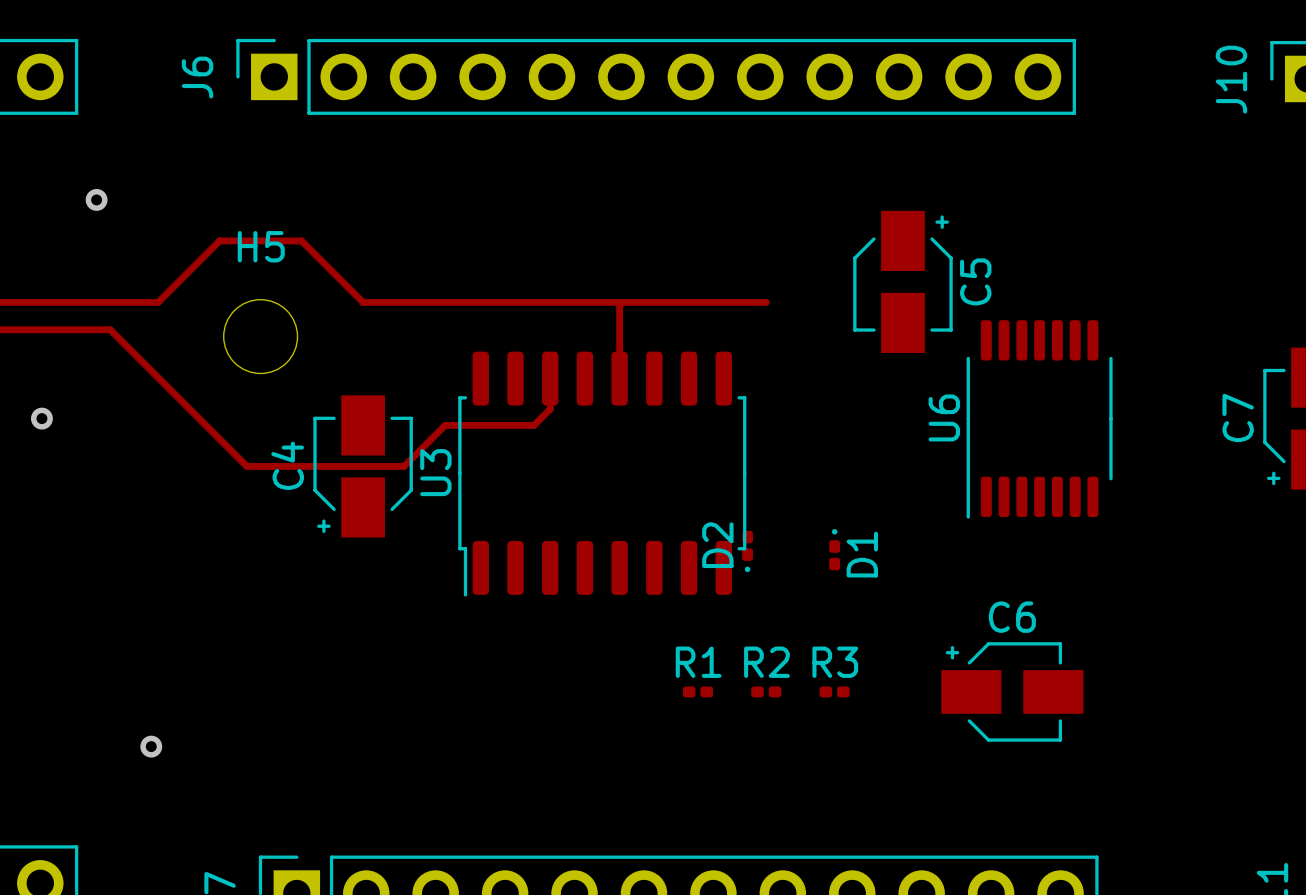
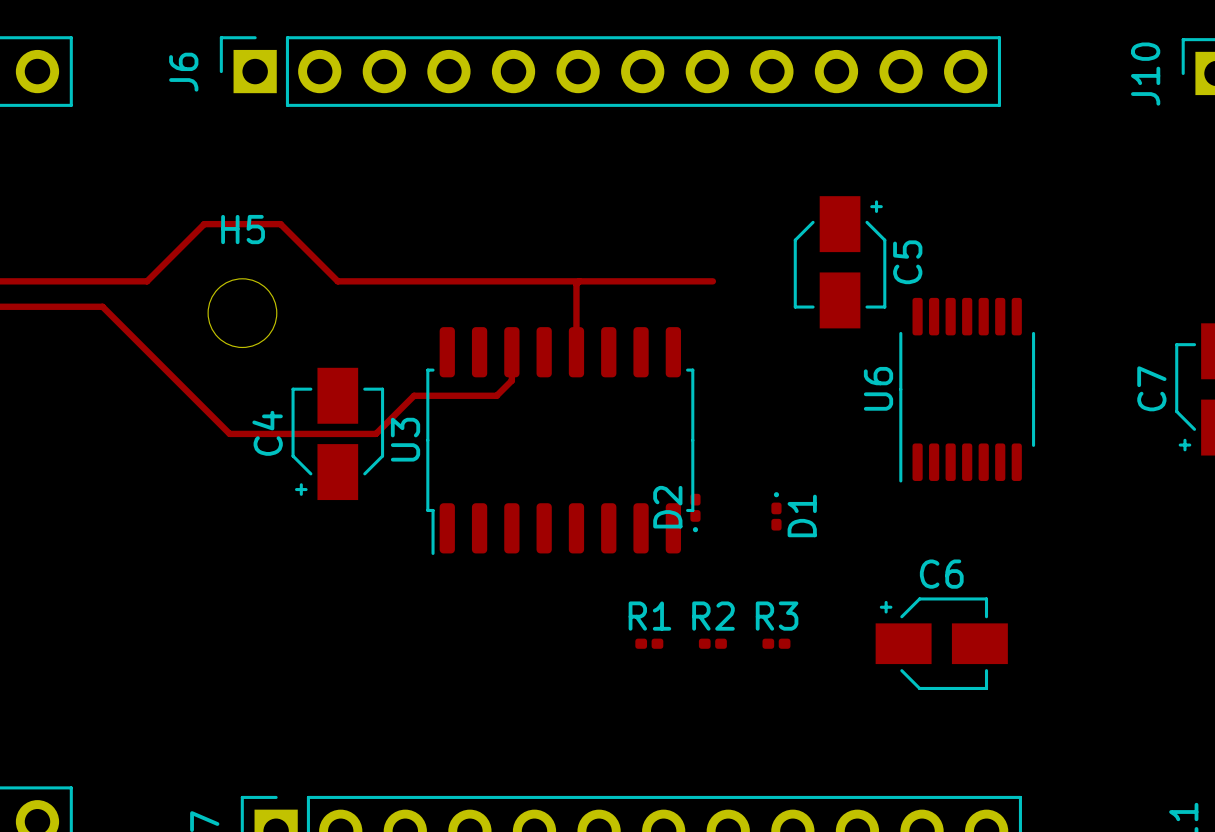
via: (96, 199) -> none
via: (41, 418) -> none
via: (151, 746) -> none

